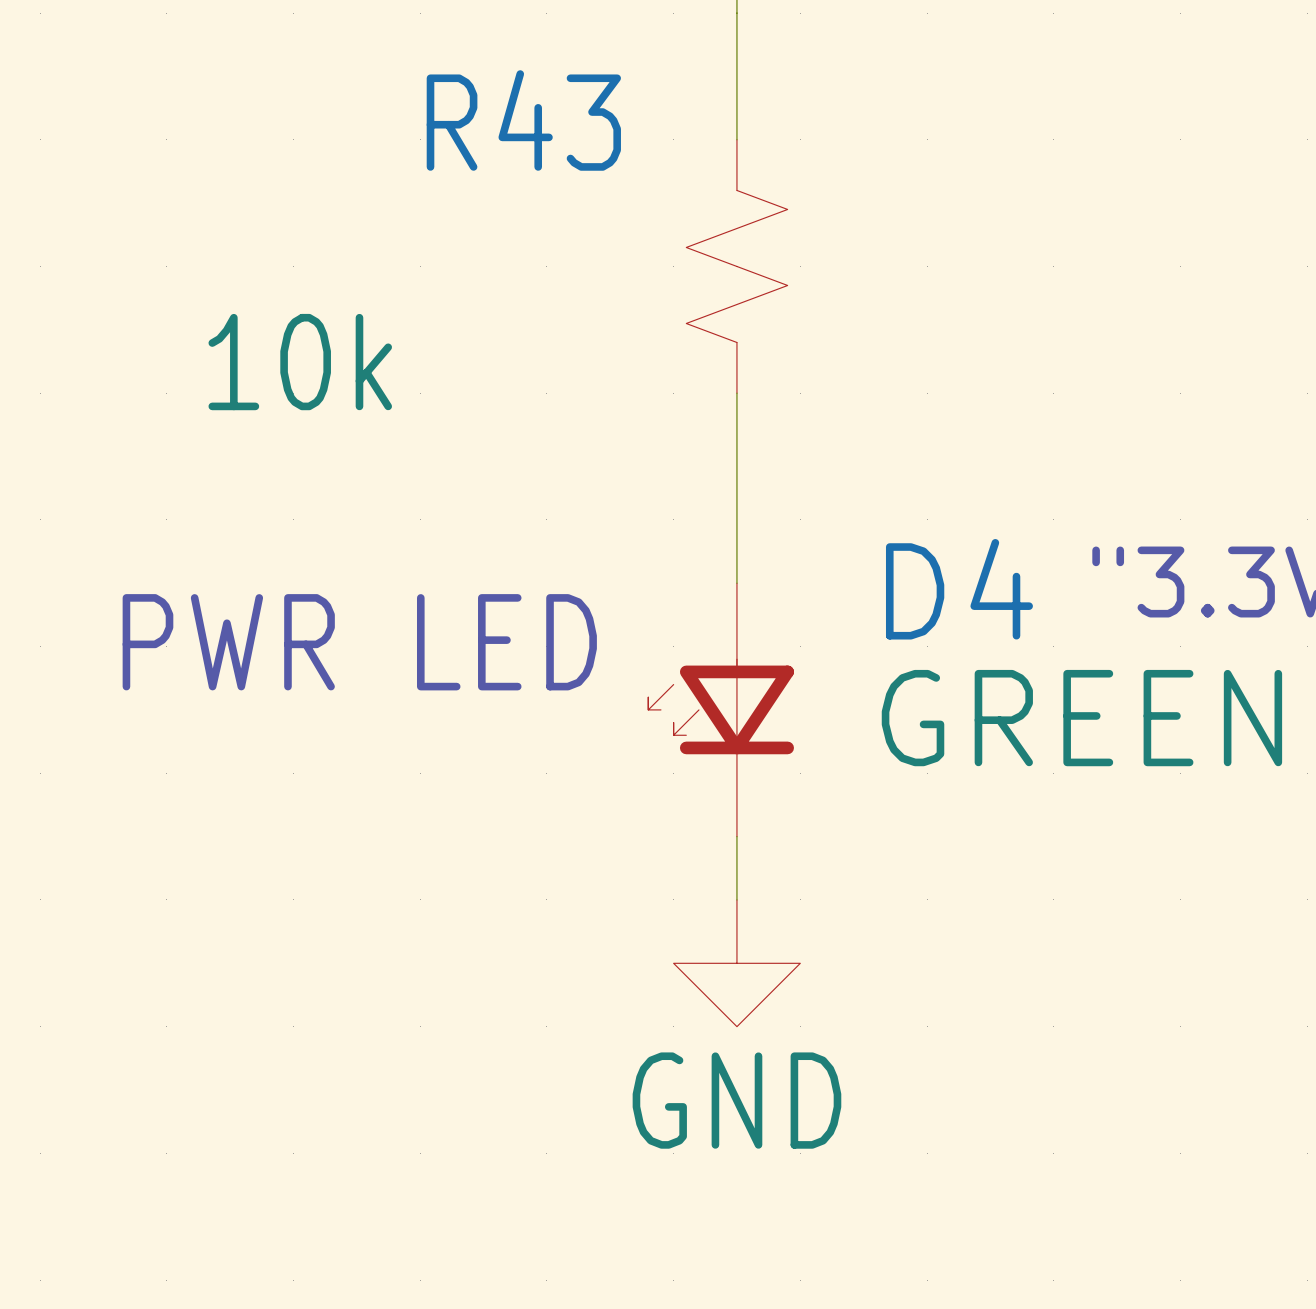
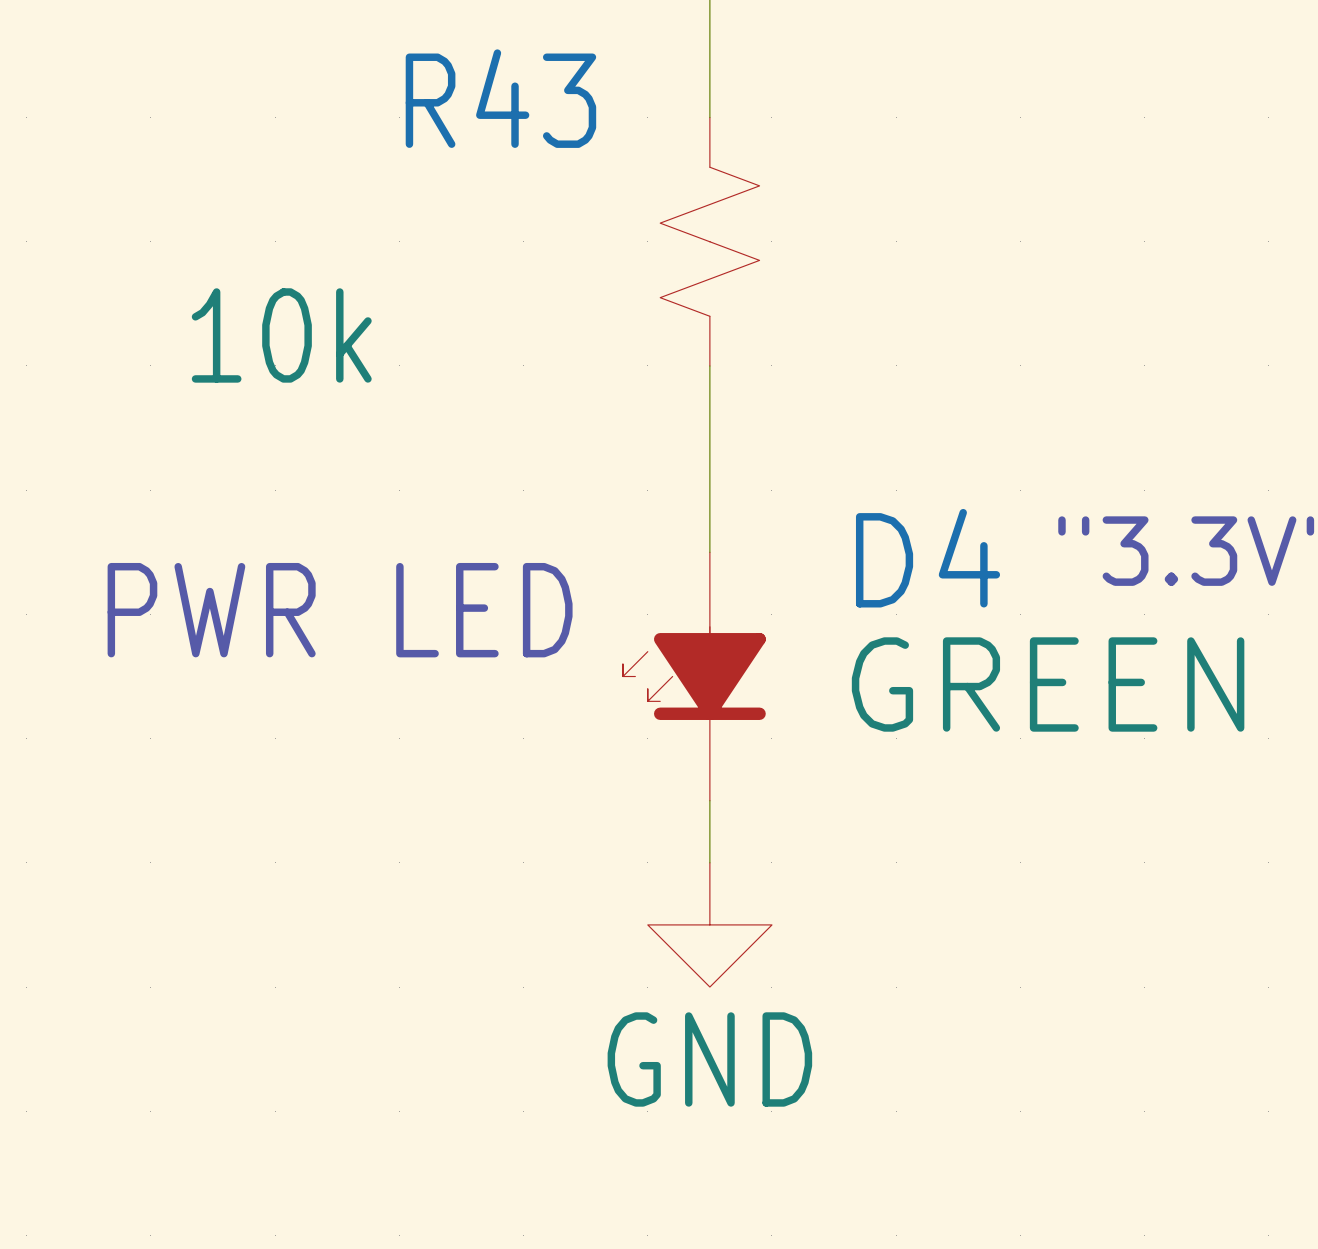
D4 symbol: [648, 583, 794, 837] -> [622, 552, 766, 801]

